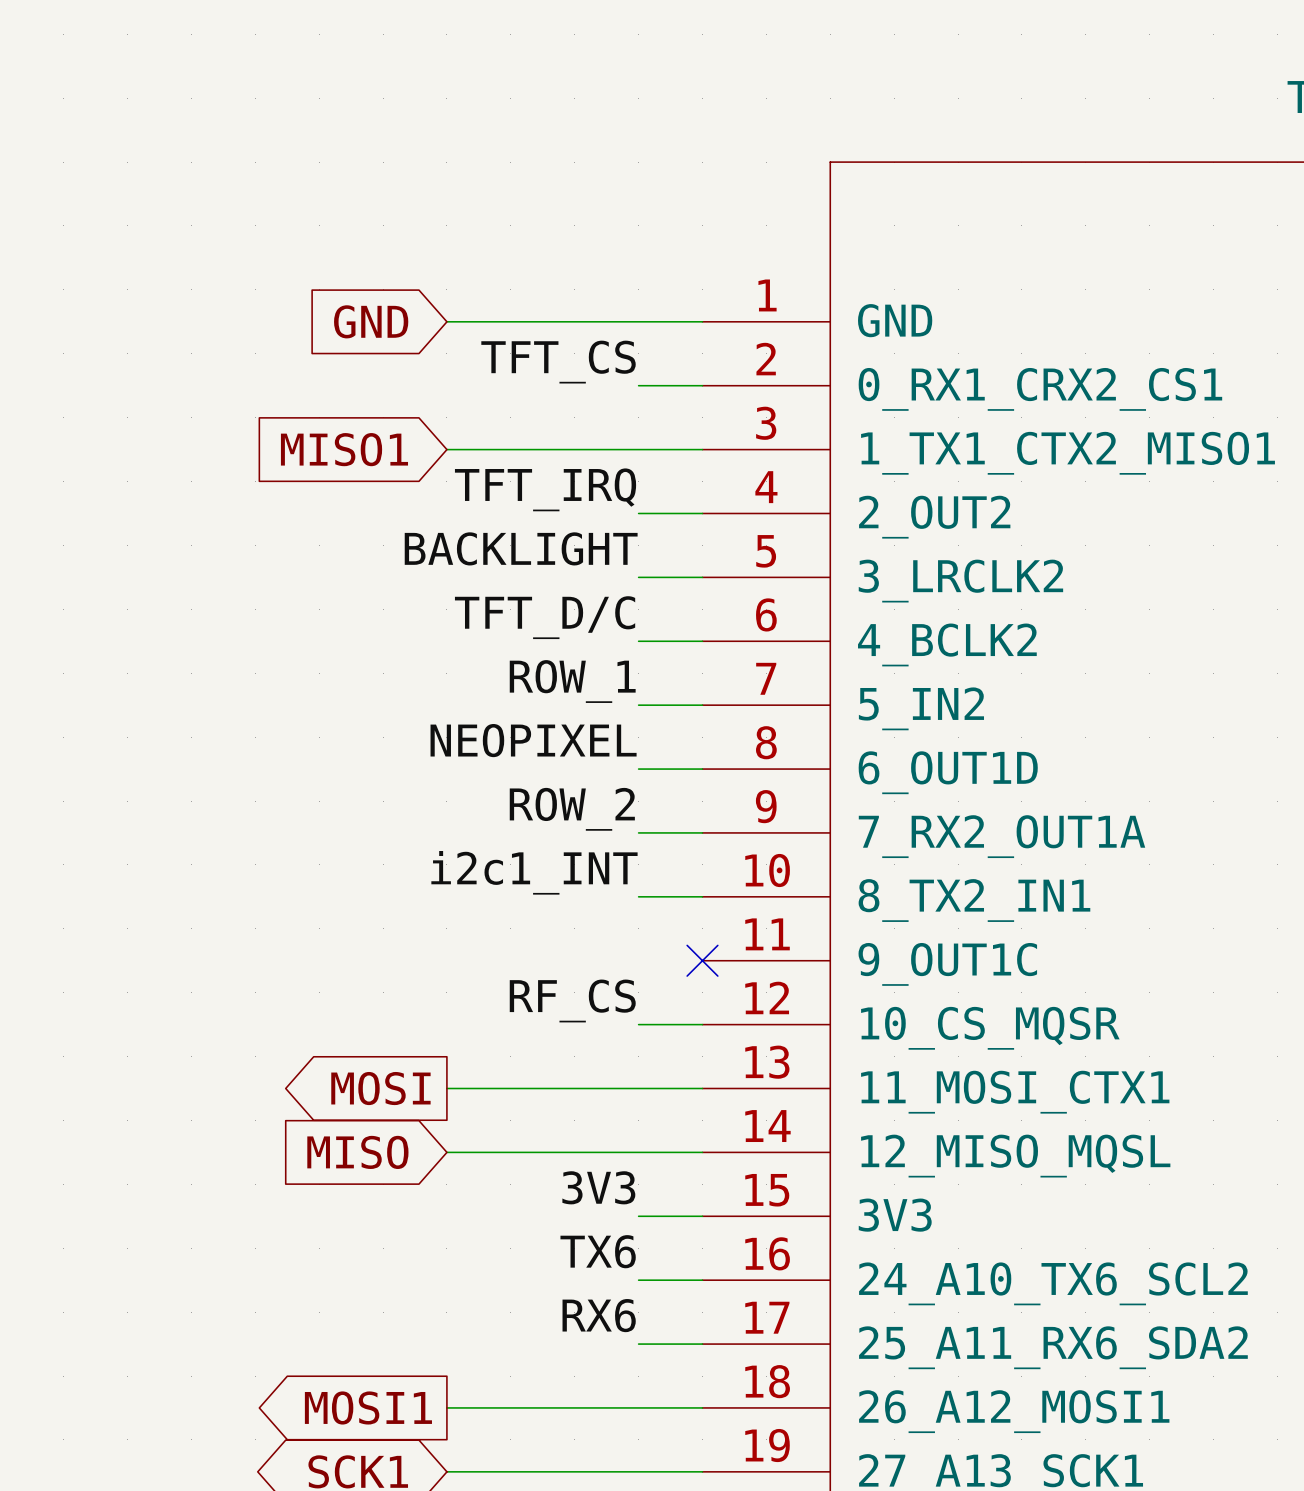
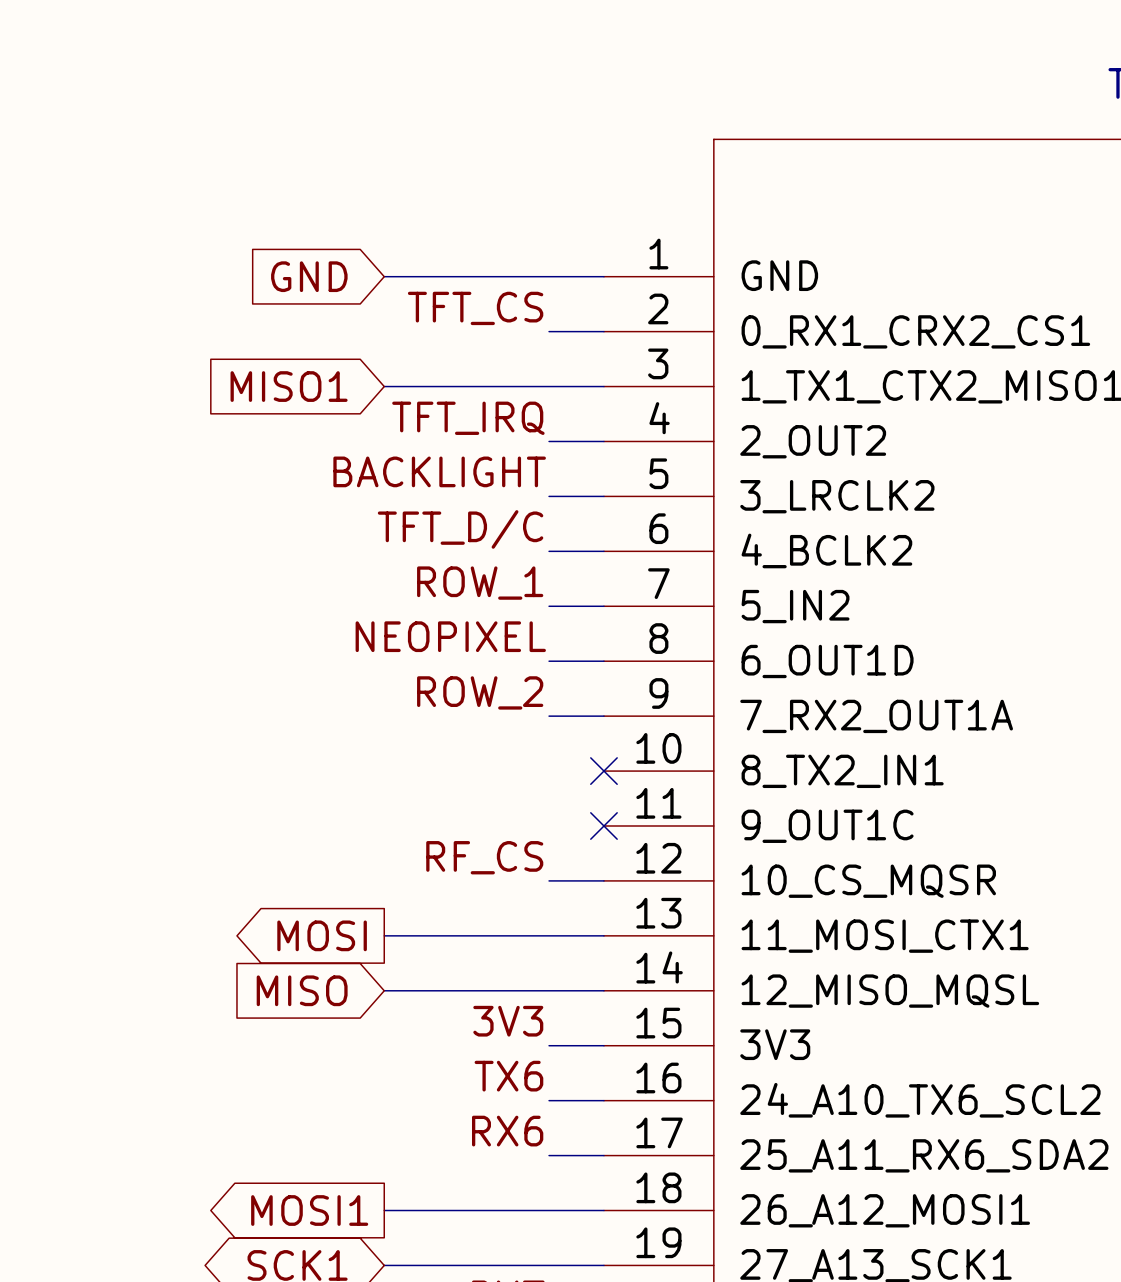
label: i2c1_INT (534, 872) -> none
wire: (638, 896) (702, 896) -> none
no-connect mark: none -> (603, 771)

